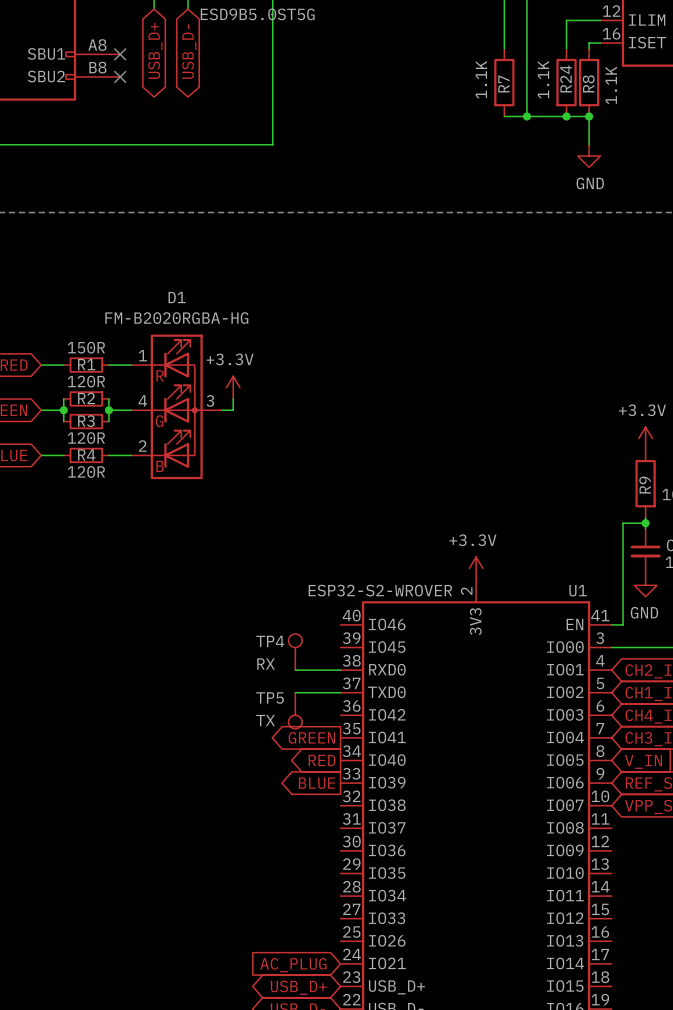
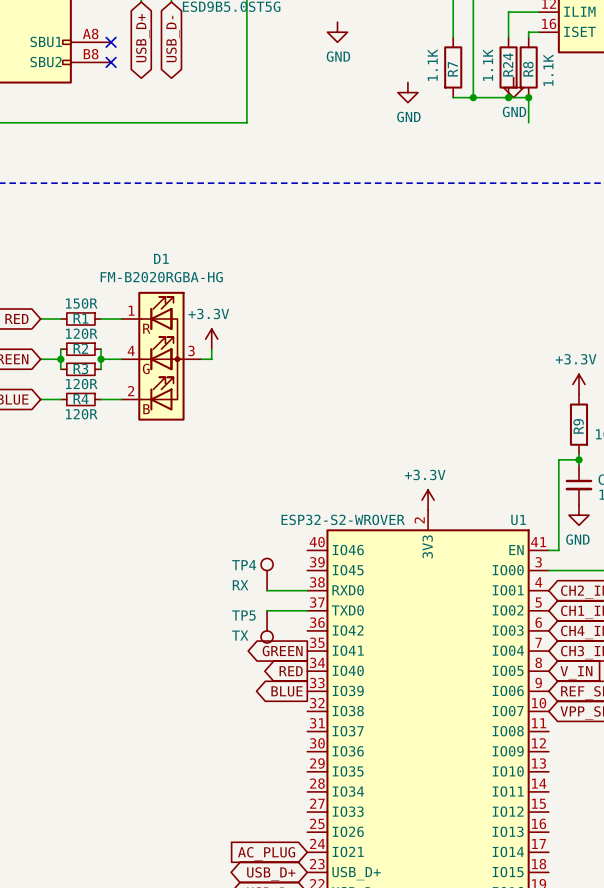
power symbol: none -> GND (337, 32)
power symbol: none -> GND (407, 92)
power symbol position: GND (589, 156) -> GND (513, 87)

